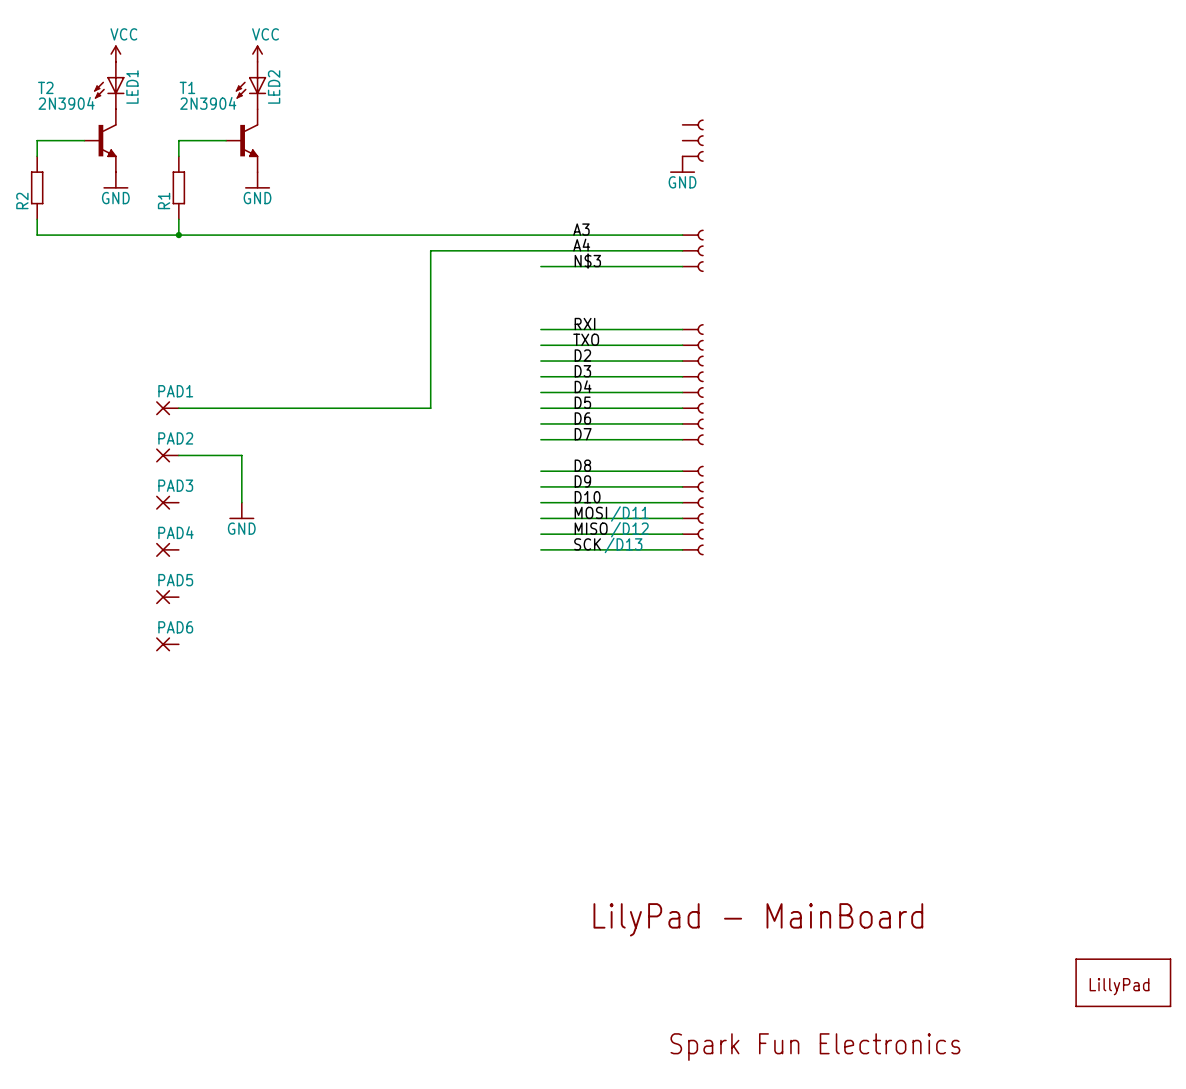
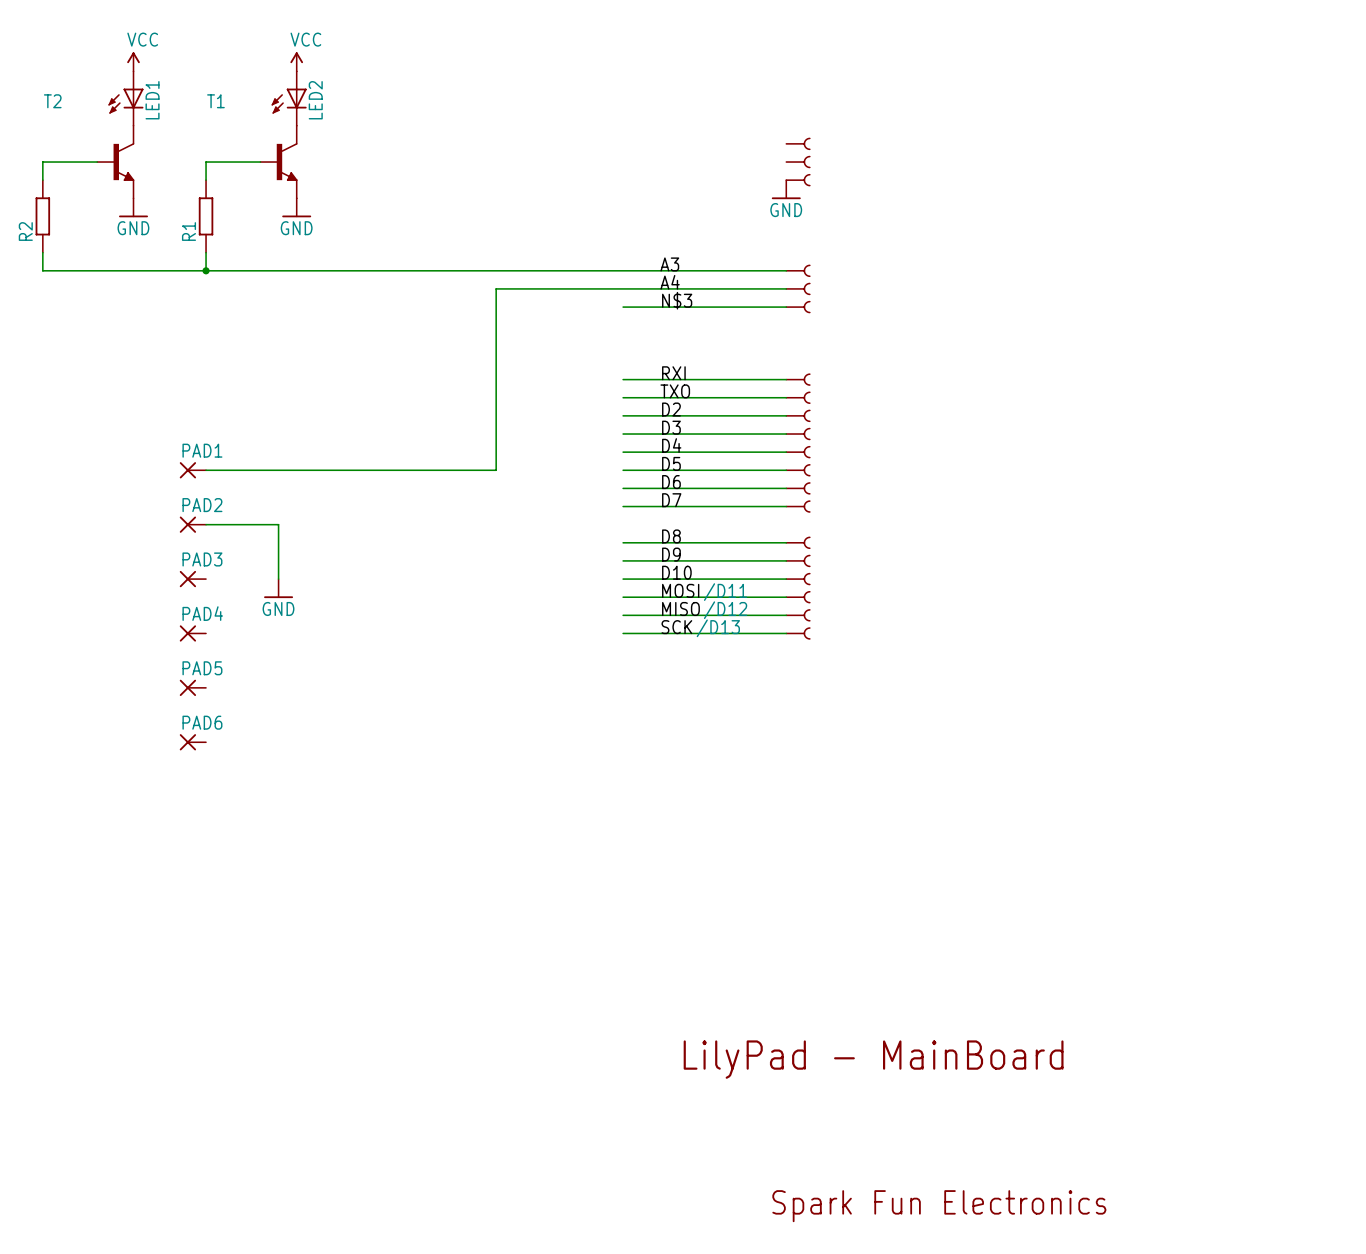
T2 value: 2N3904 (66, 103) -> none
T1 value: 2N3904 (208, 103) -> none
part: (1123, 982) -> none

